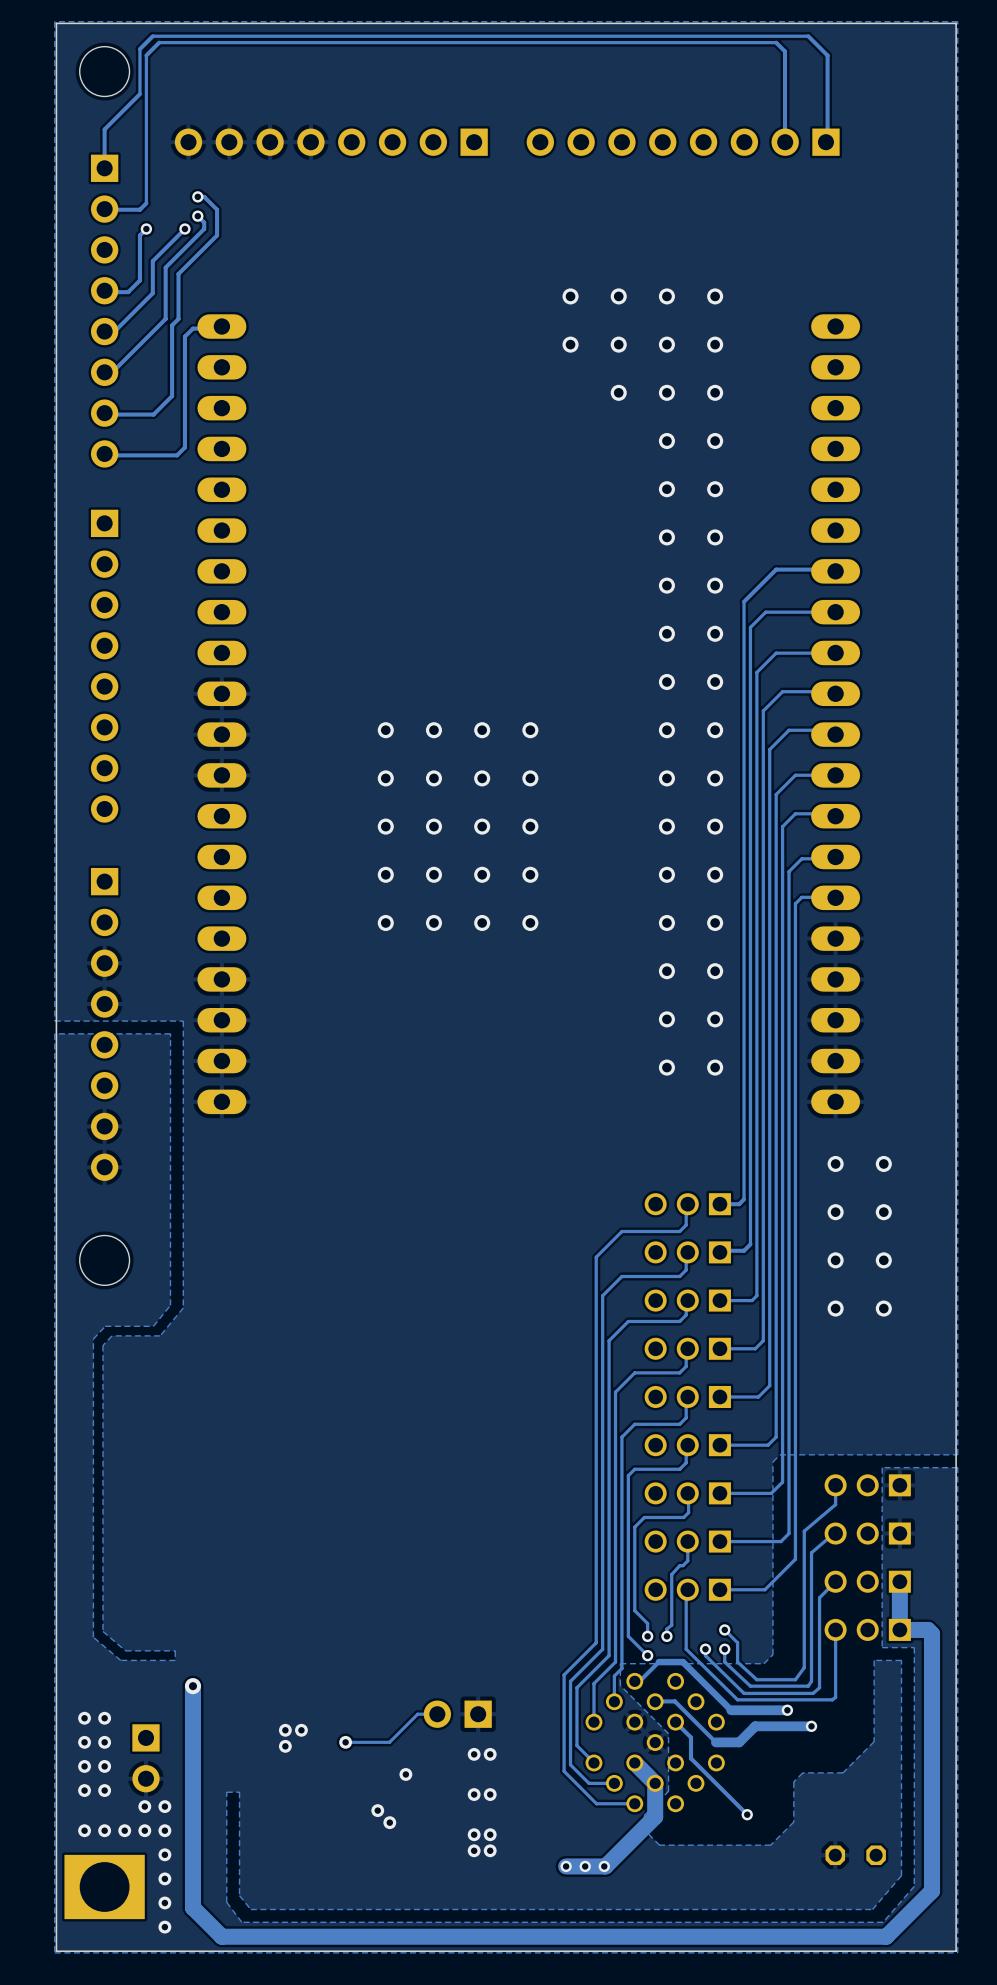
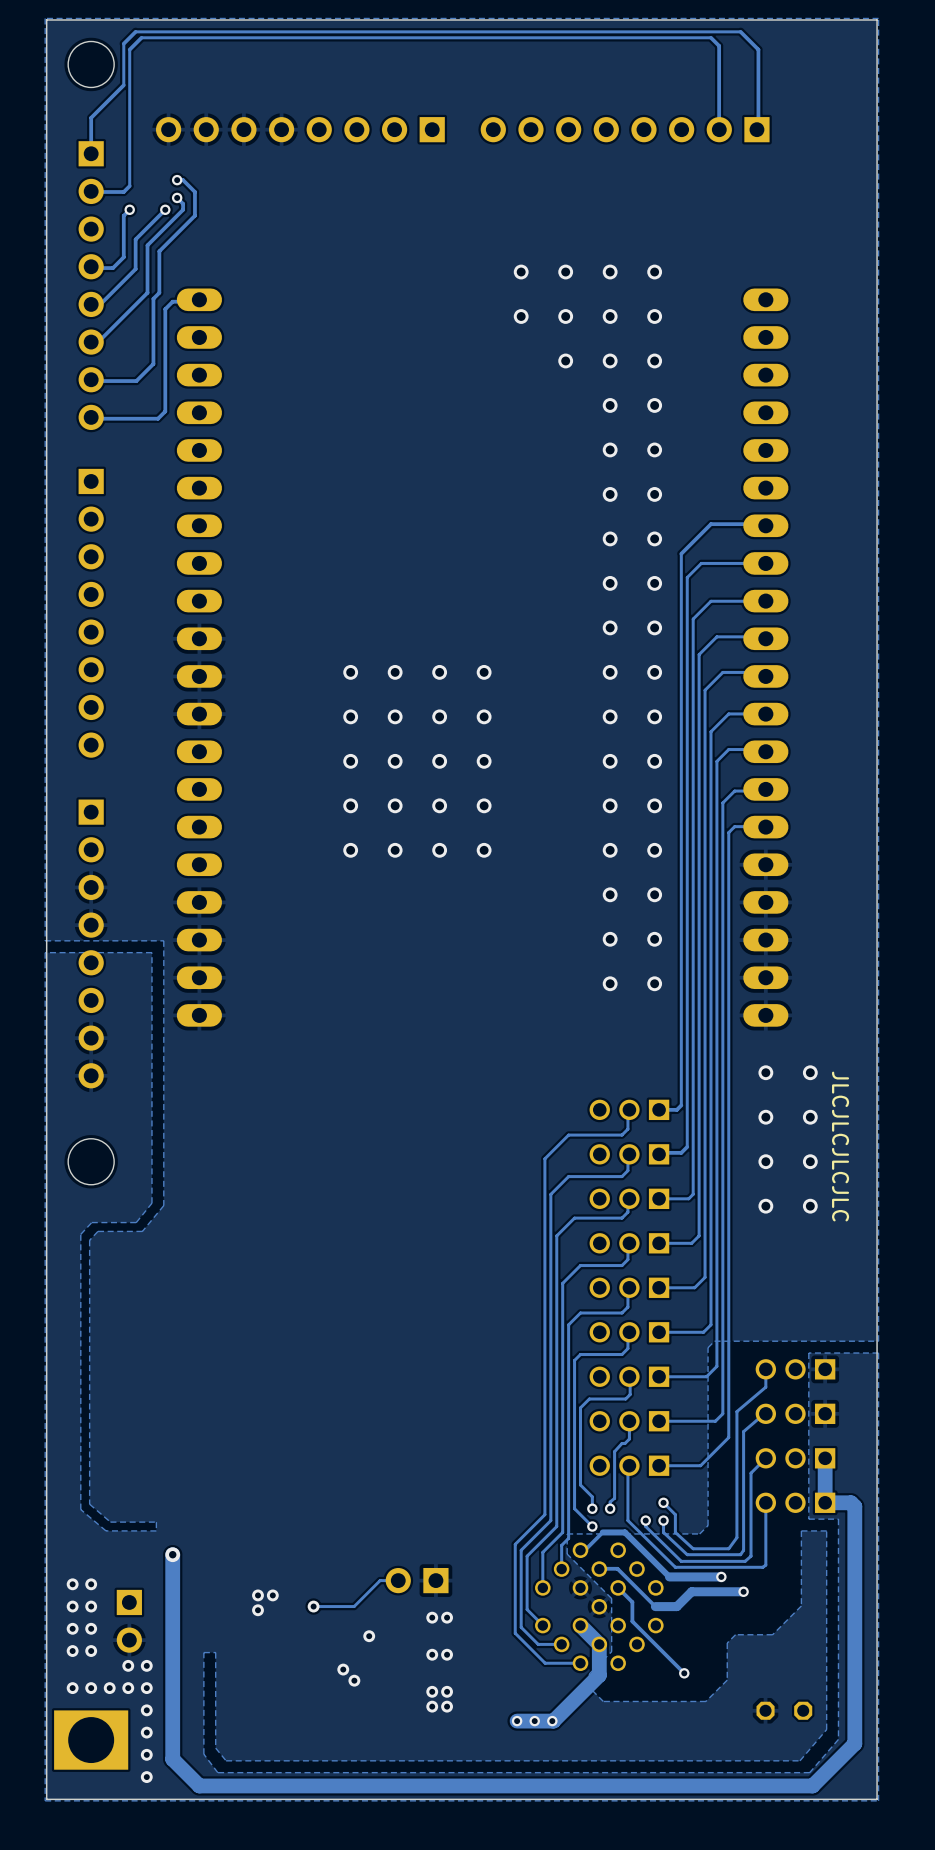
text: none -> JLCJLCJLCJLC (840, 1146)

